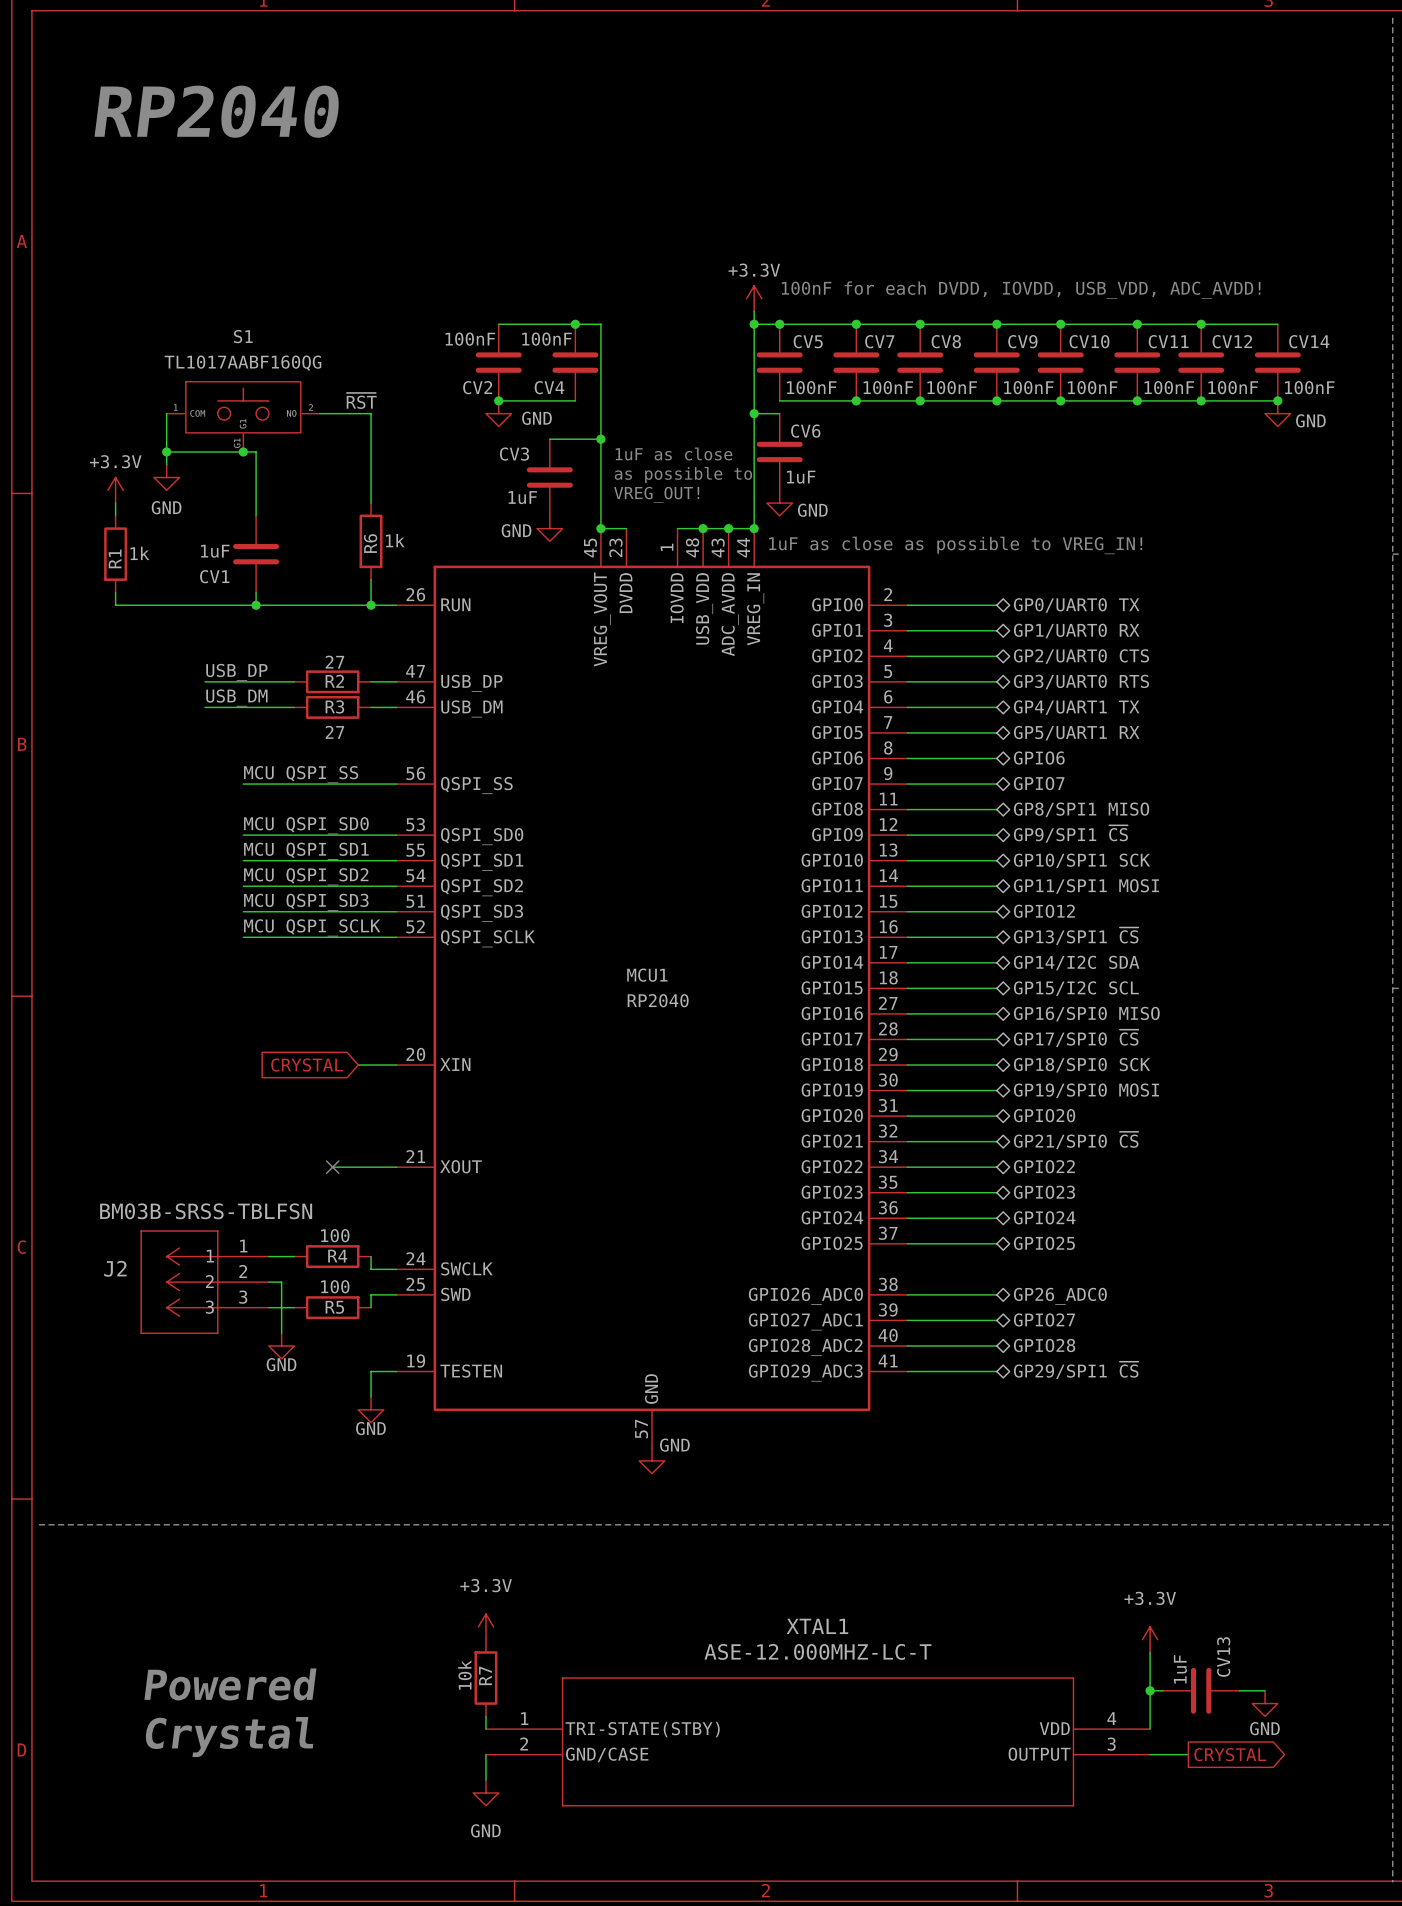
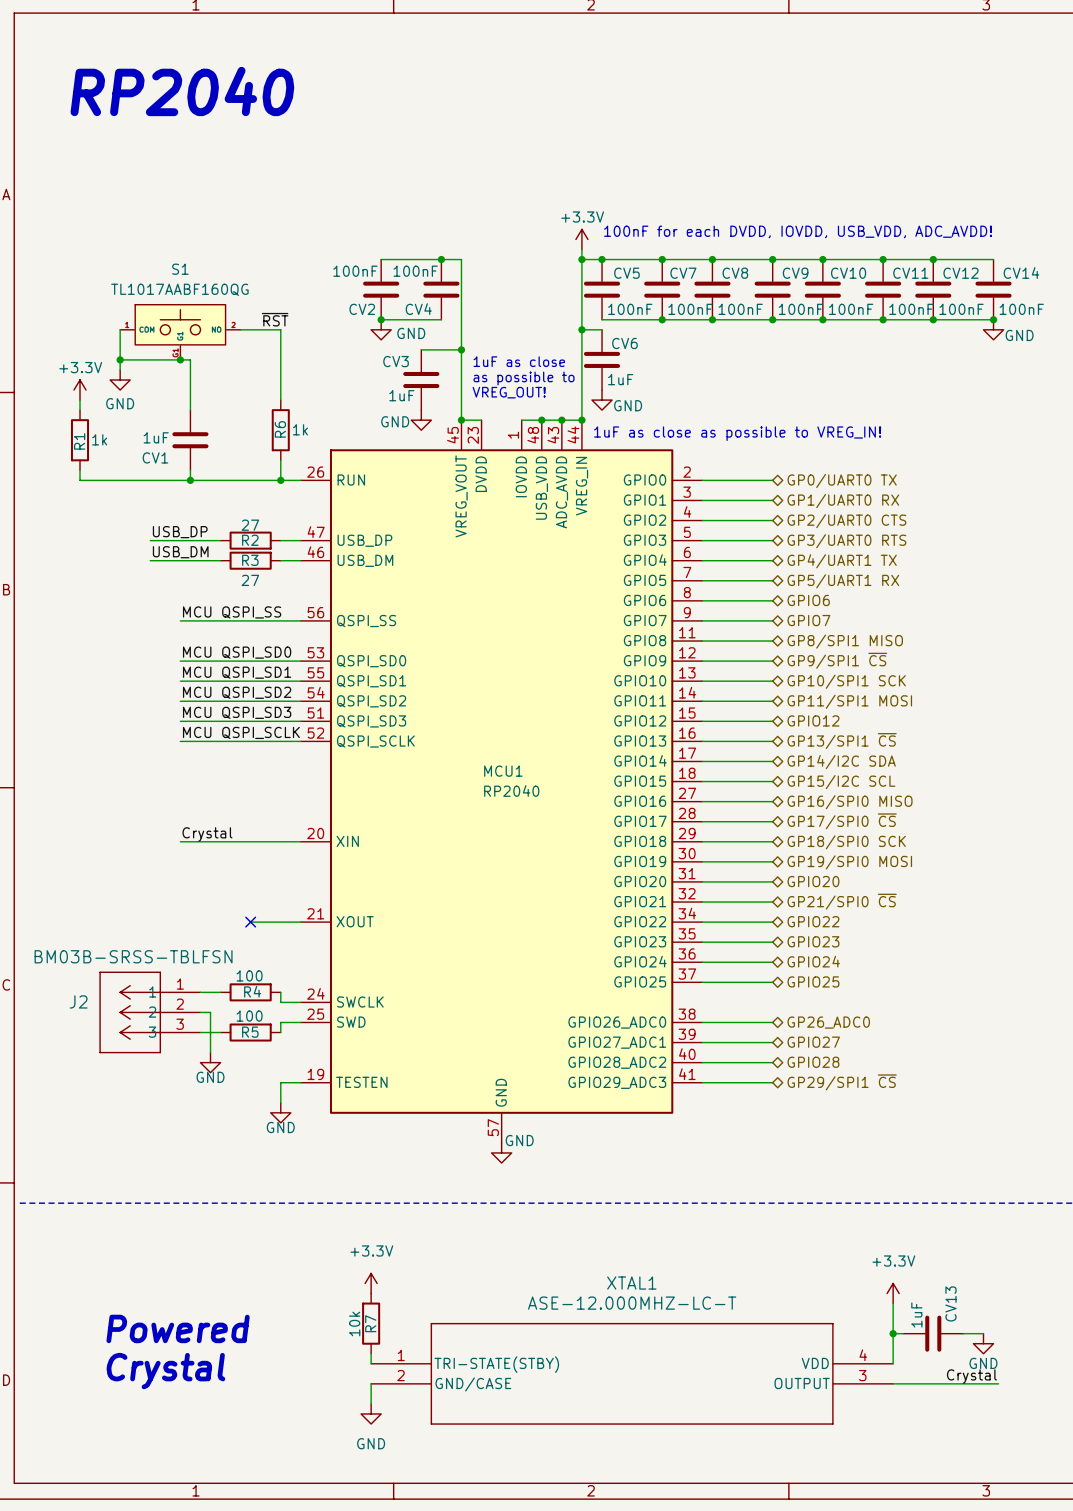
label: none -> Crystal (207, 834)
wire: none -> (180, 841) (270, 841)
global label: CRYSTAL (307, 1065) -> none
label: none -> Crystal (971, 1376)
wire: none -> (923, 1383) (998, 1383)
global label: CRYSTAL (1230, 1754) -> none

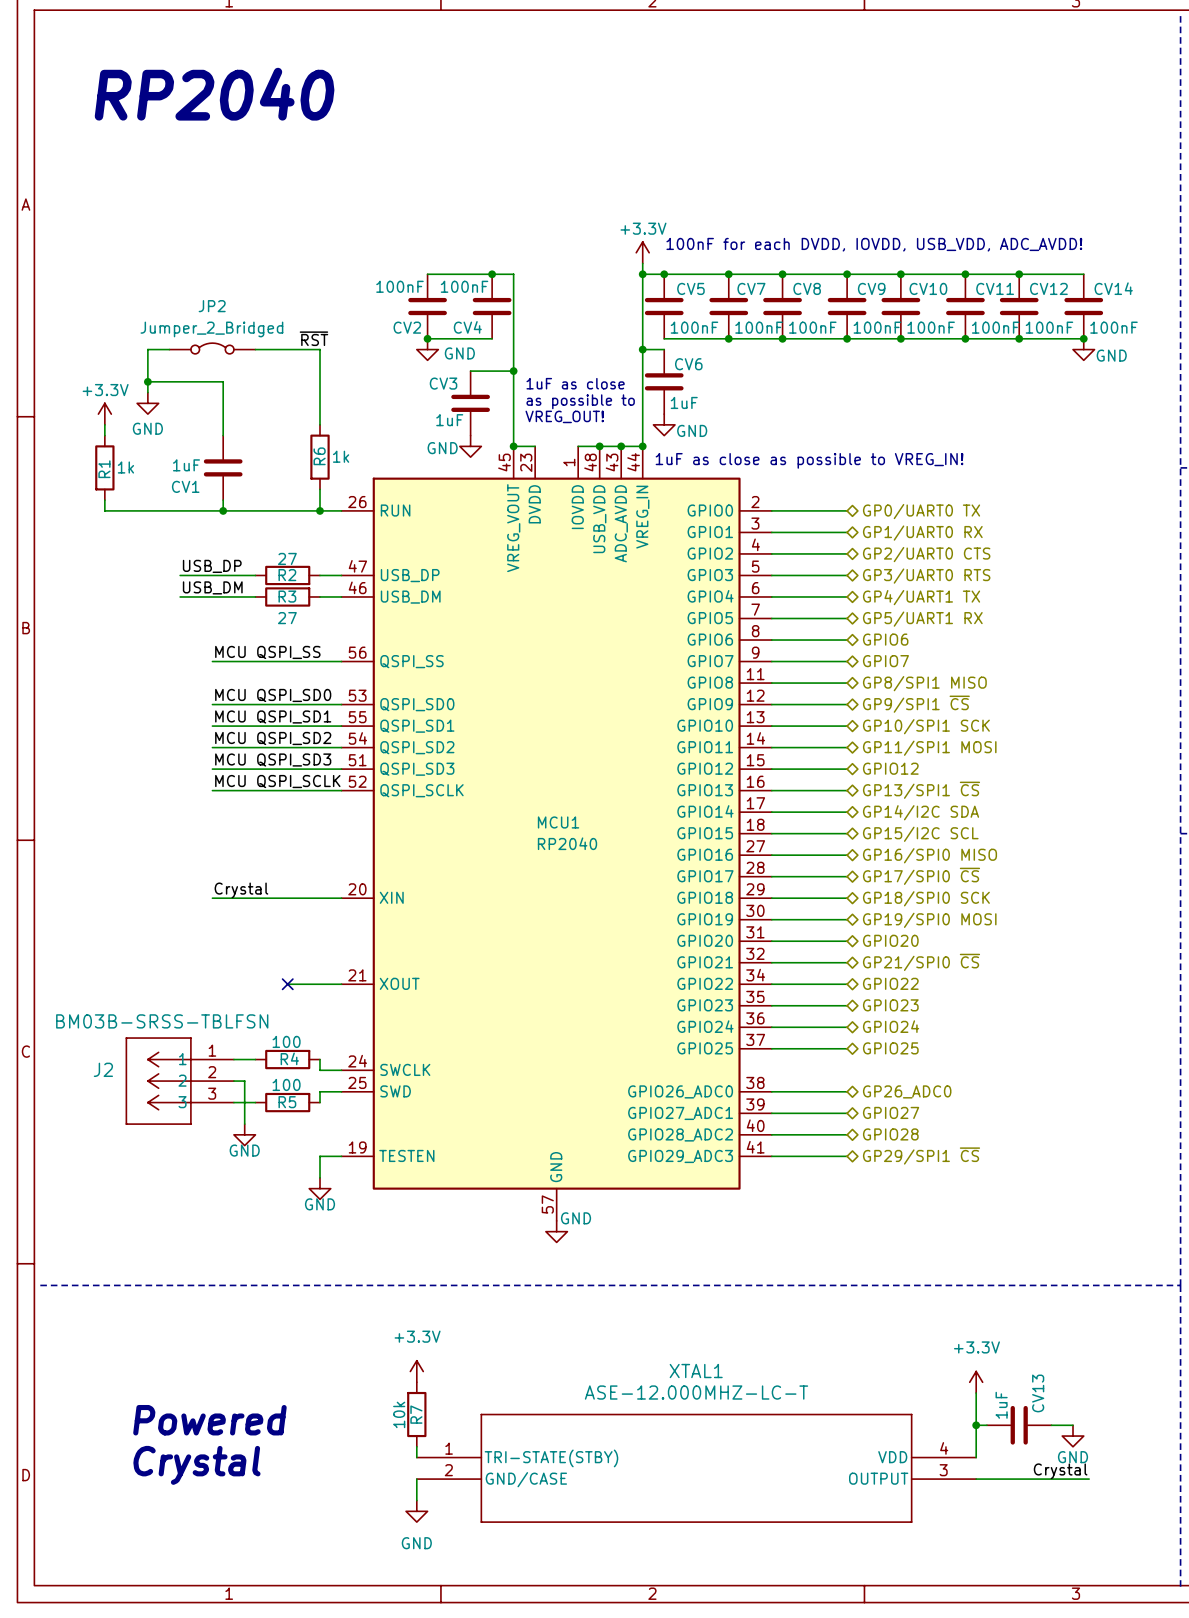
JP2: none -> Jumper_2_Bridged (212, 348)
S1: TL1017AABF160QG (180, 332) -> none
junction: (180, 359) -> none

